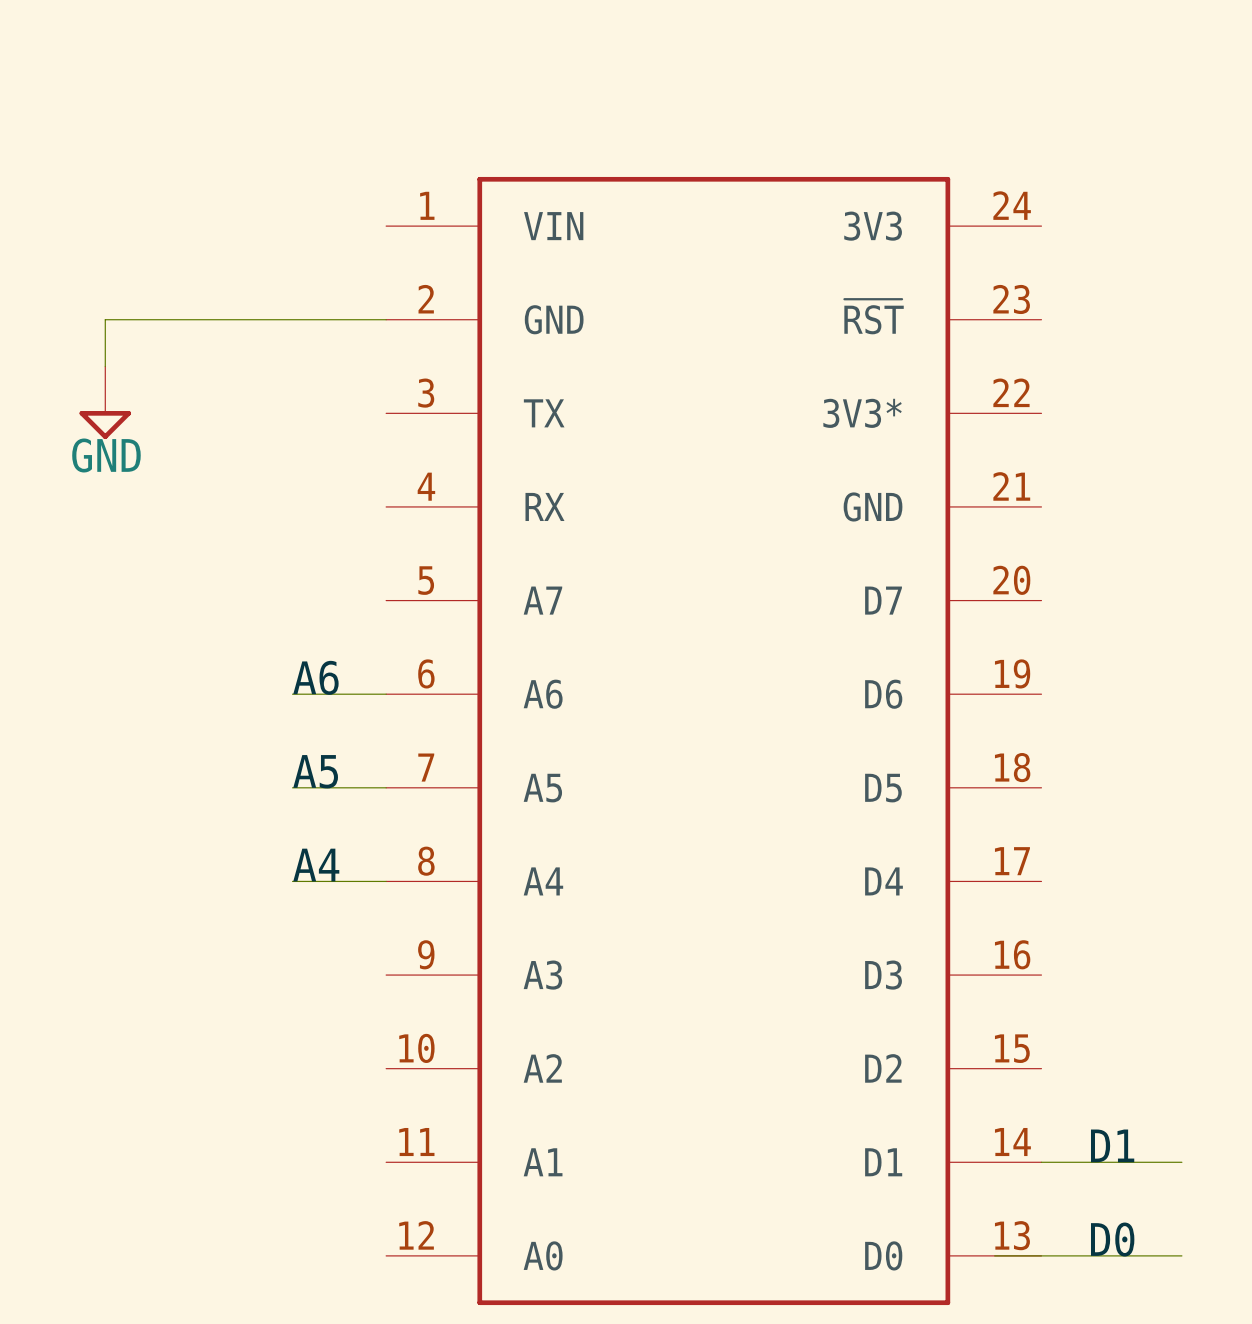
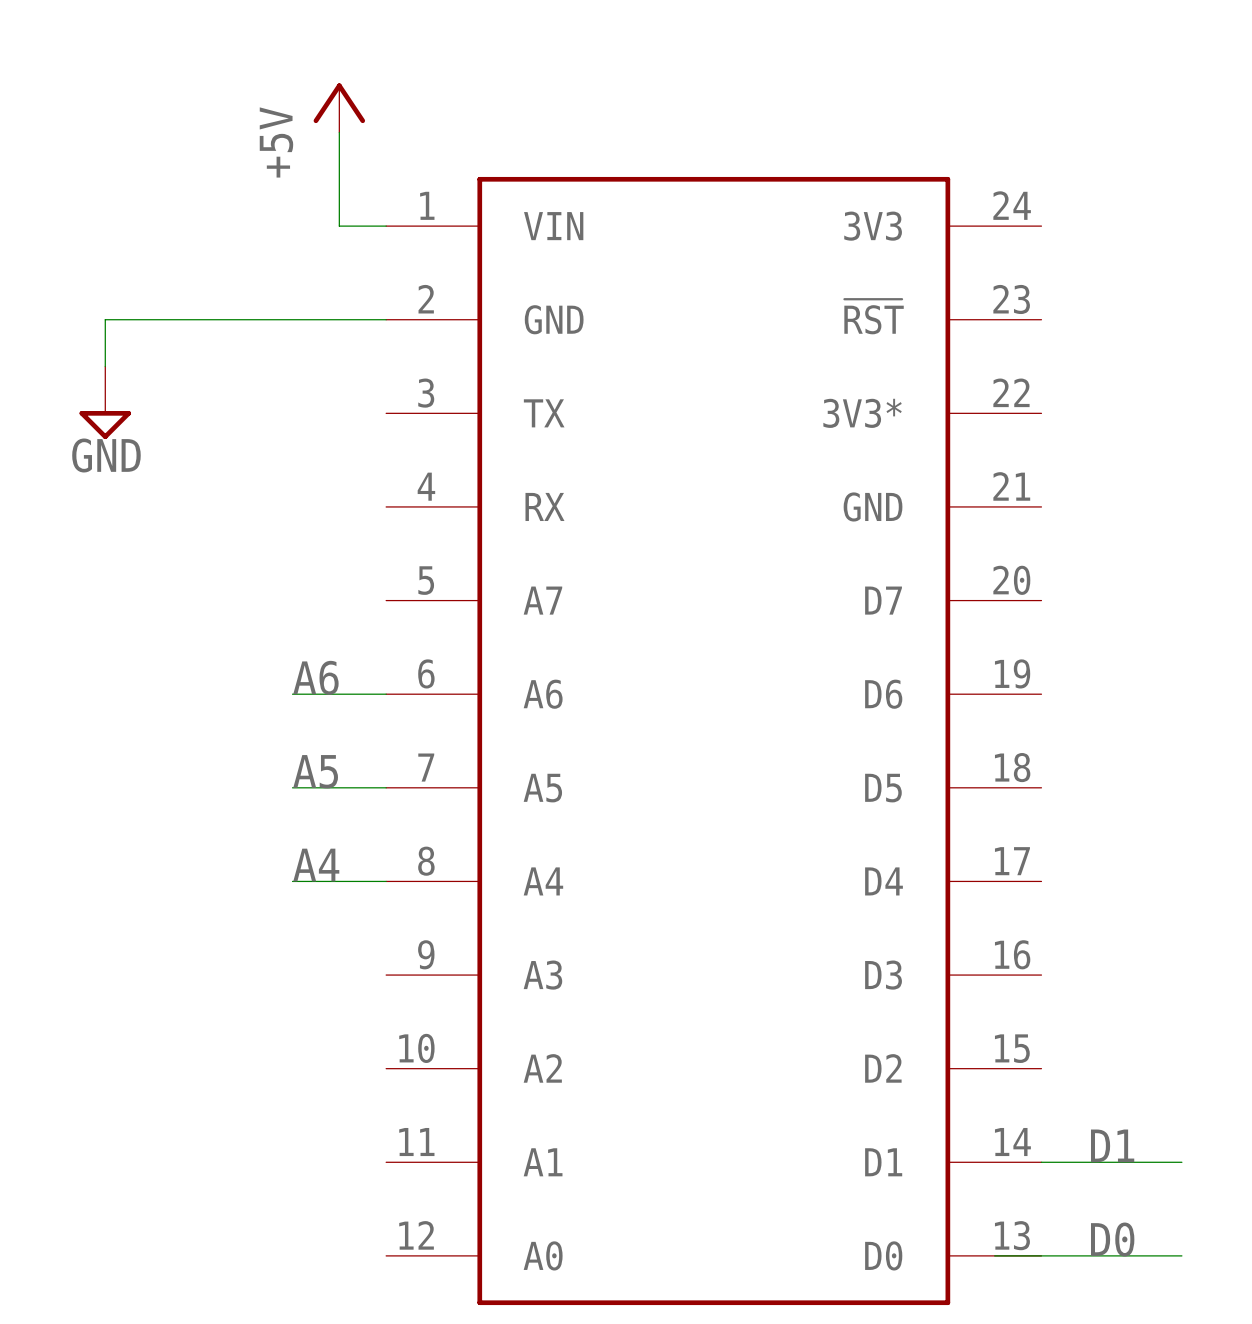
power symbol: none -> +5V (339, 107)
wire: none -> (339, 132) (339, 226) (386, 226)

